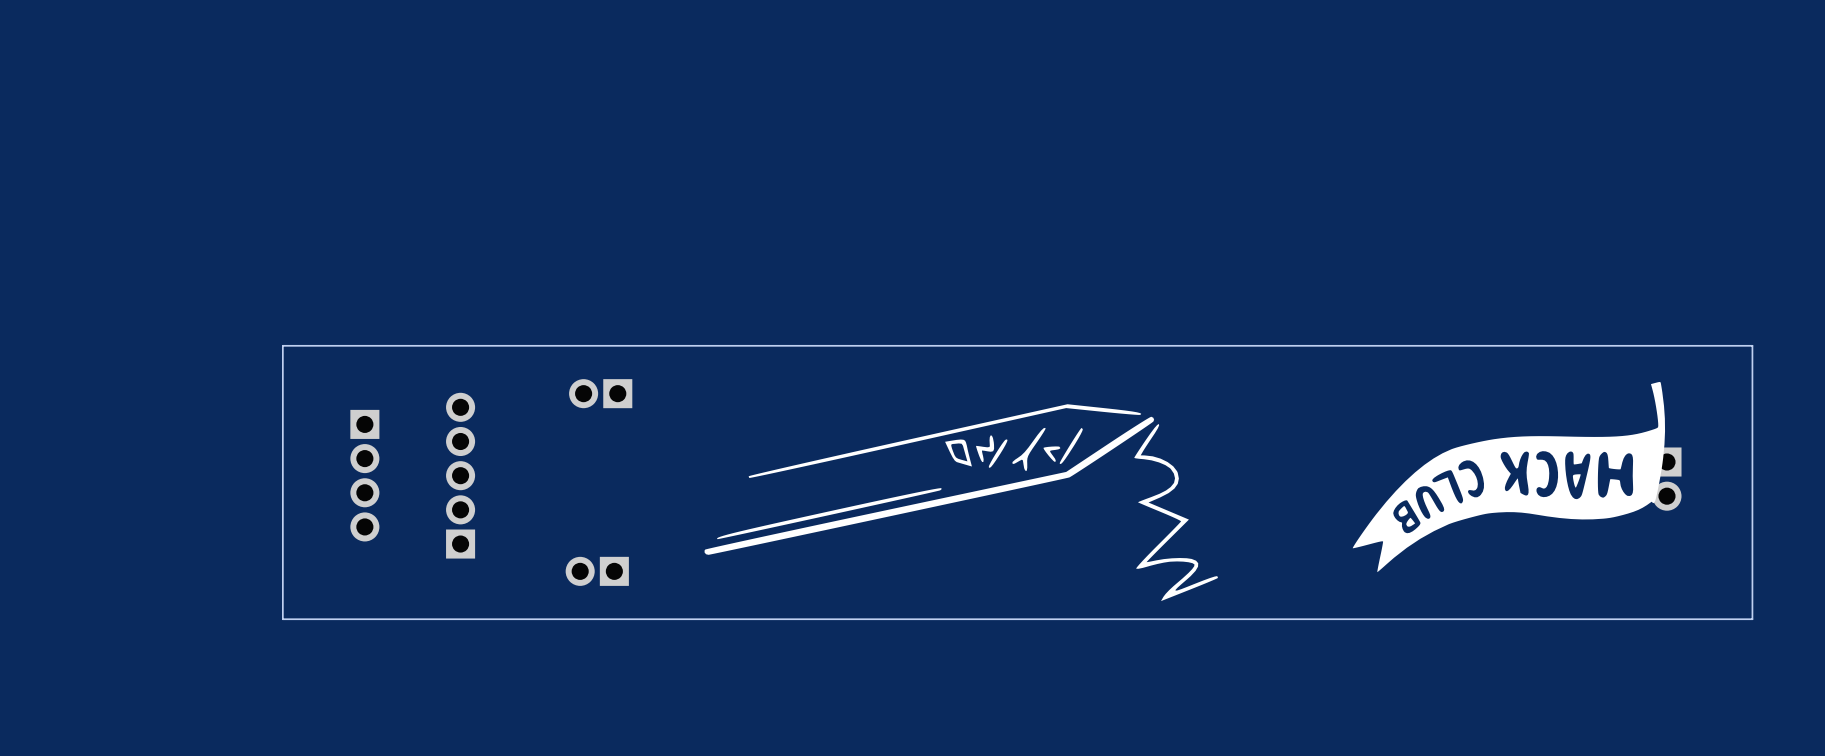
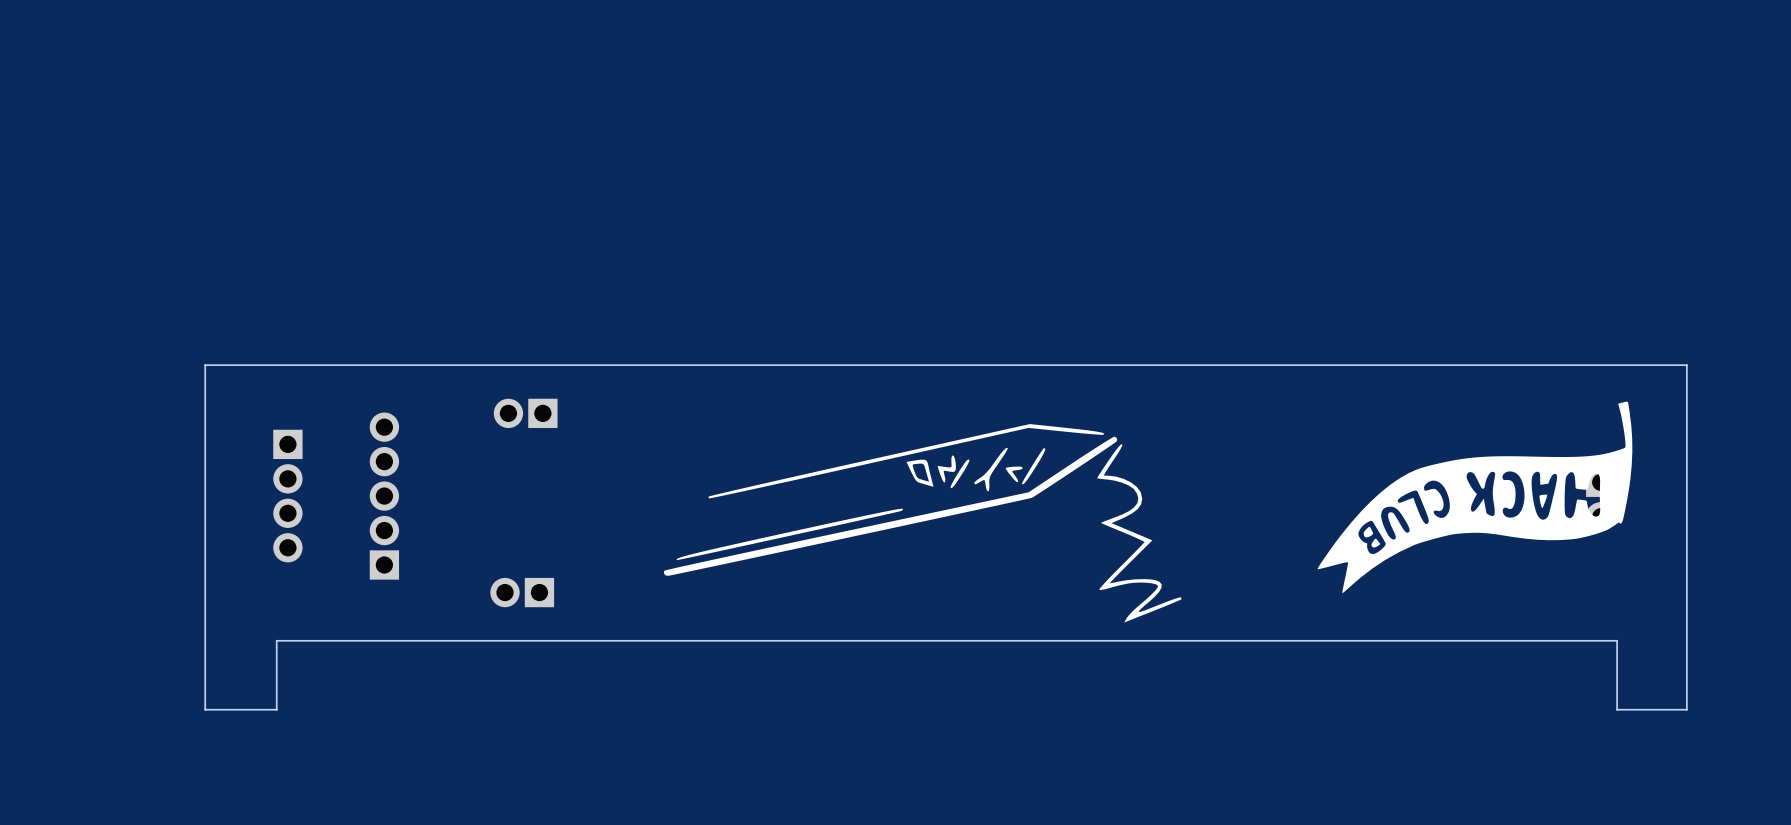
drawing position: (1508, 477) -> (1474, 497)
drawing position: (961, 502) -> (922, 523)
board edge: (353, 619) (282, 619) -> (276, 640) (276, 709) (205, 709) (205, 640)
board edge: (1752, 619) (1683, 619) -> (1686, 640) (1686, 709) (1617, 709) (1617, 640)

